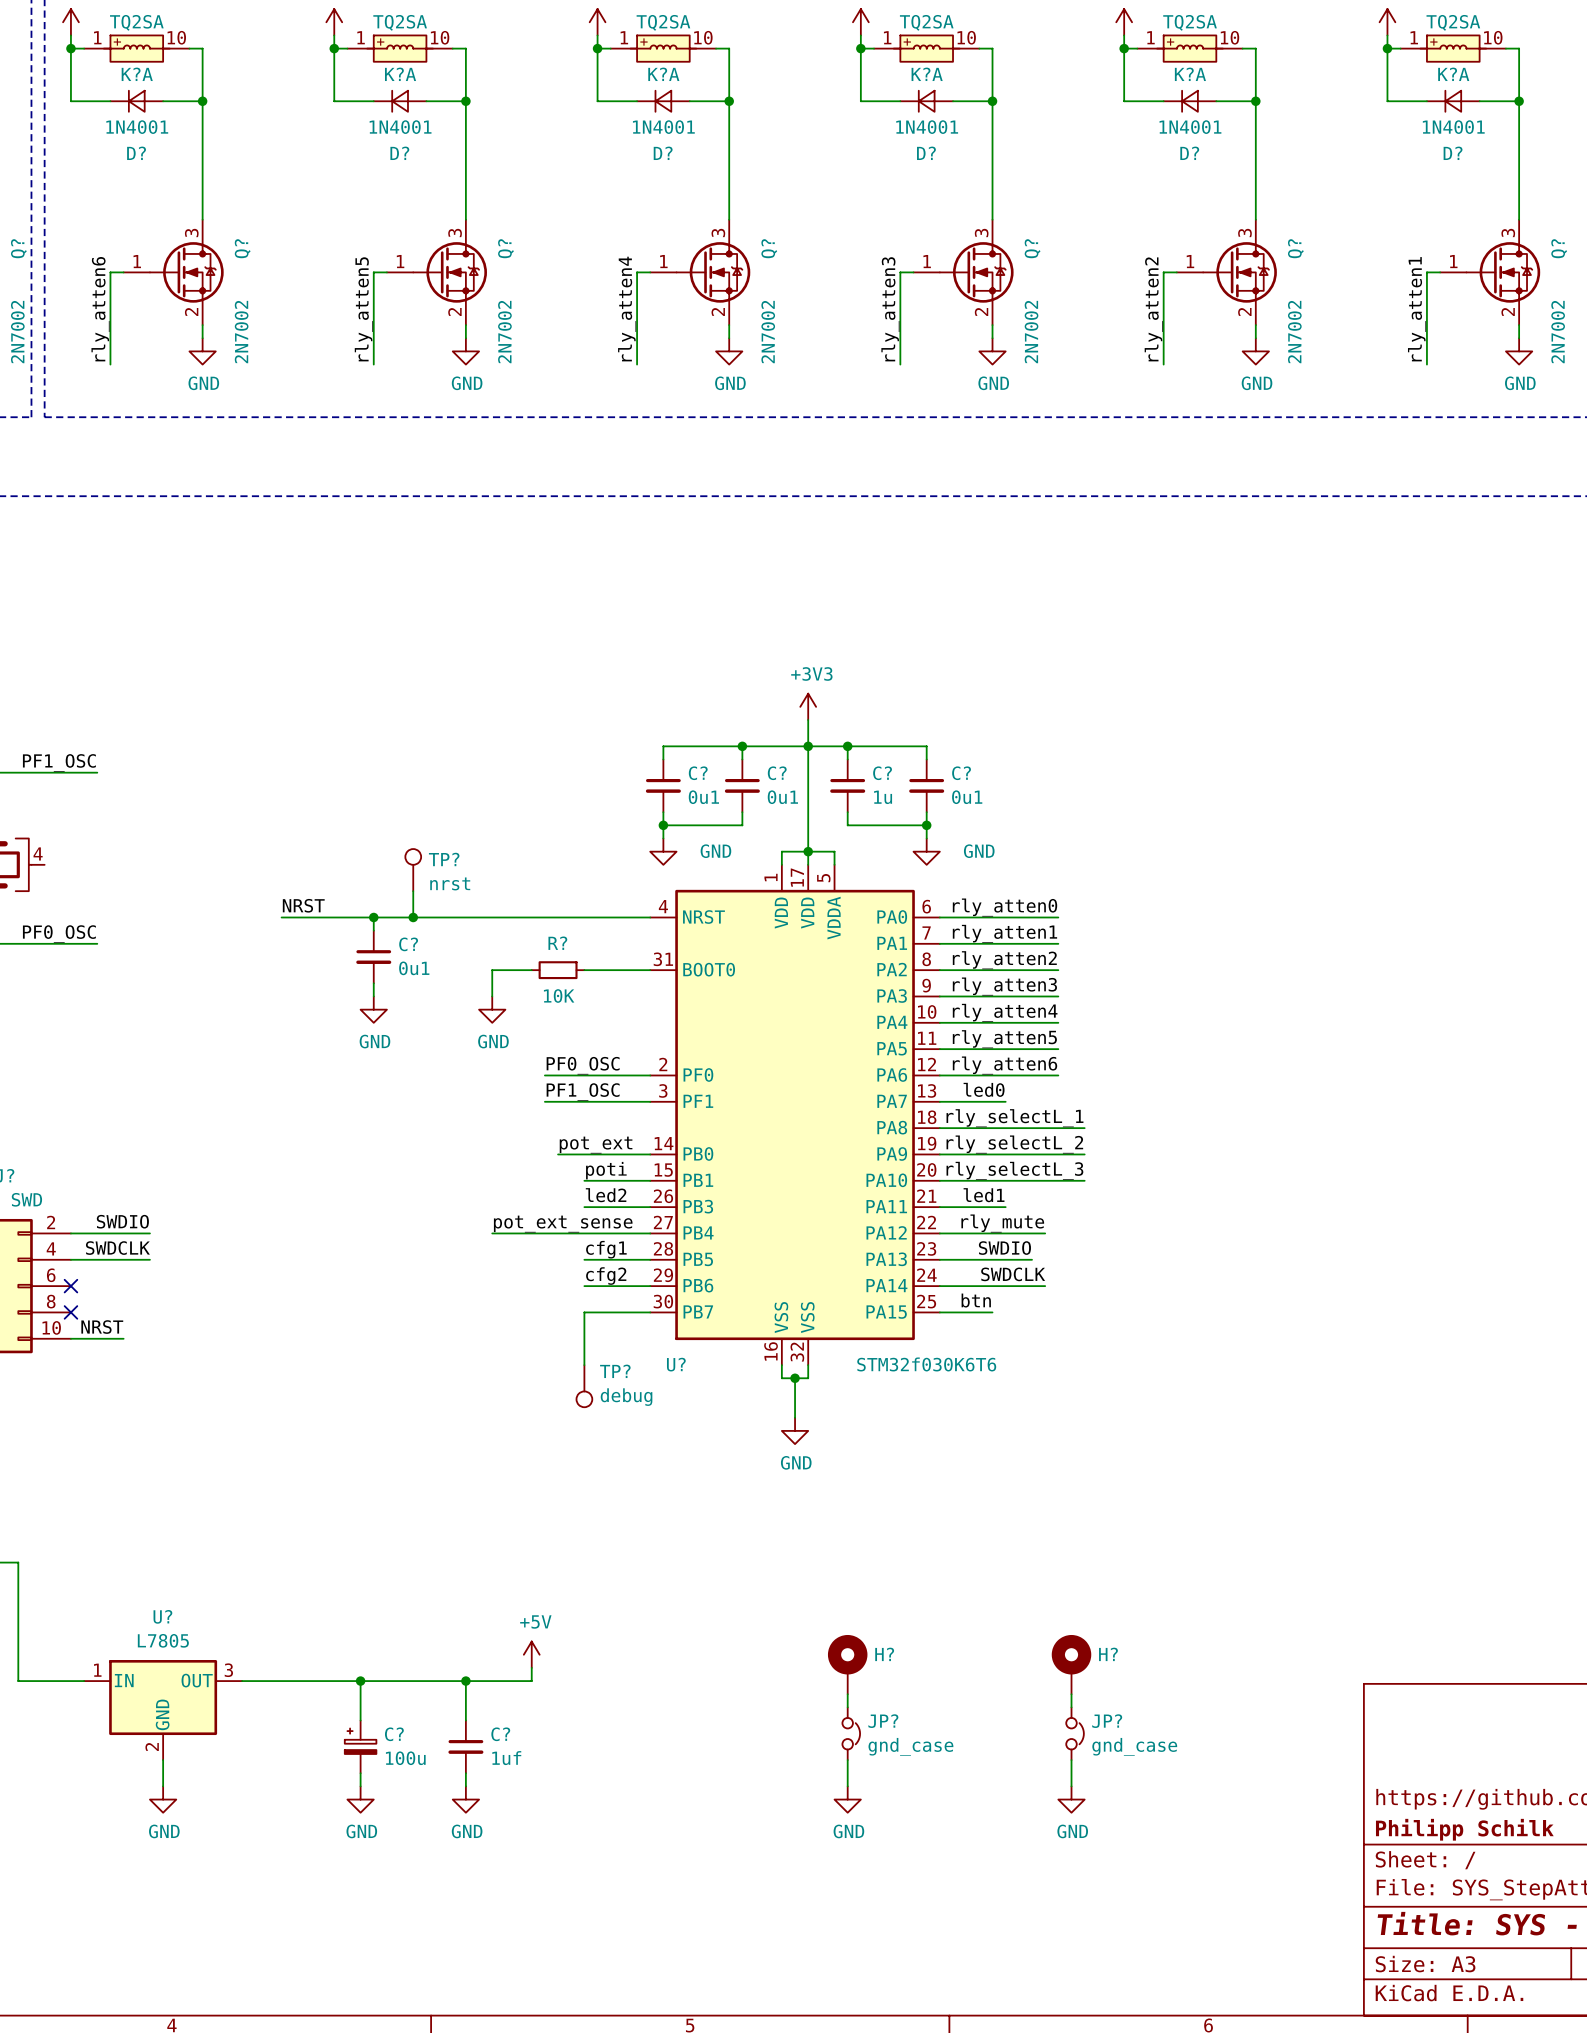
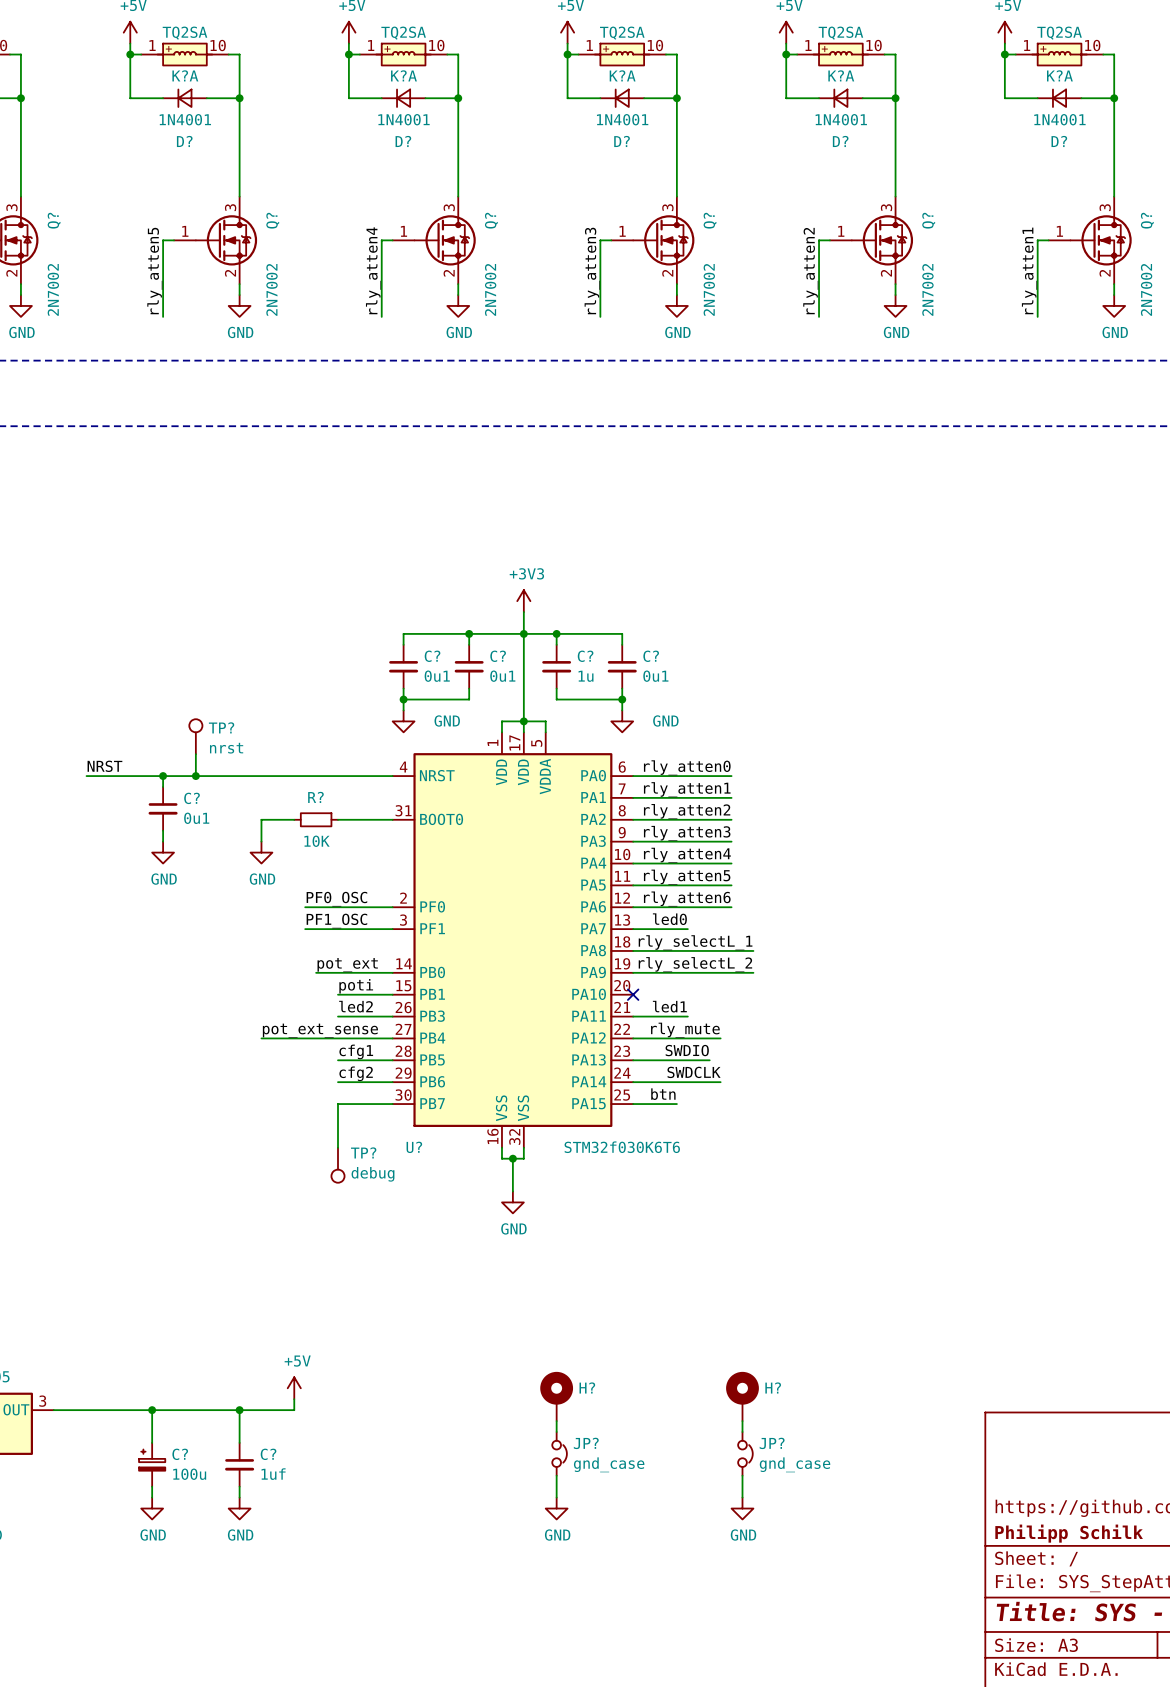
label: rly_selectL_3 (1014, 1170) -> none
wire: (939, 1180) (1084, 1180) -> none
no-connect mark: none -> (633, 994)

